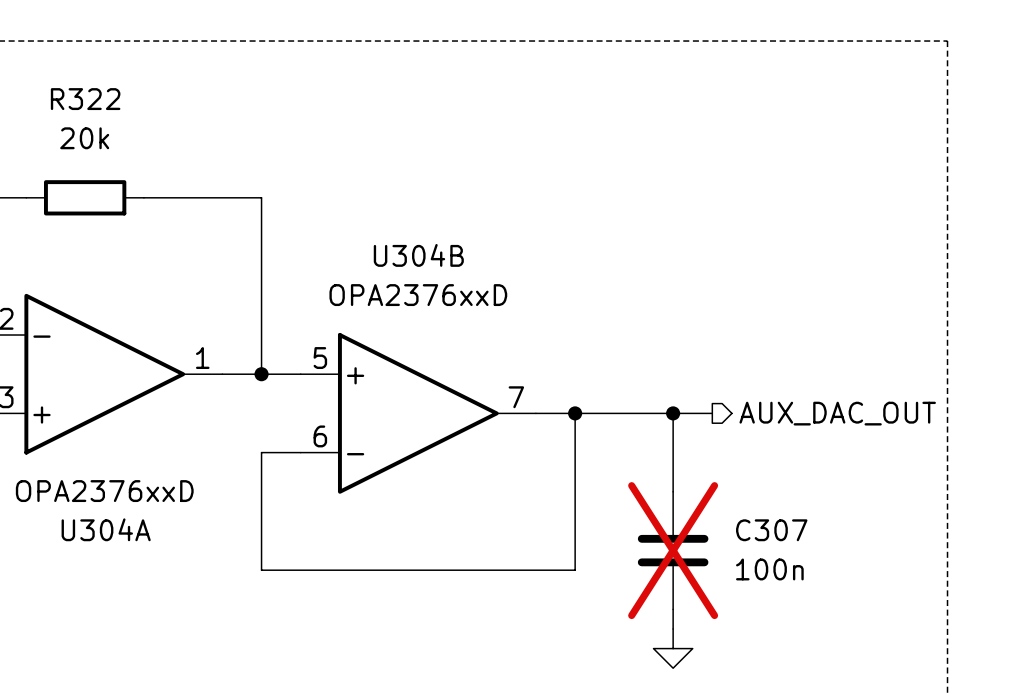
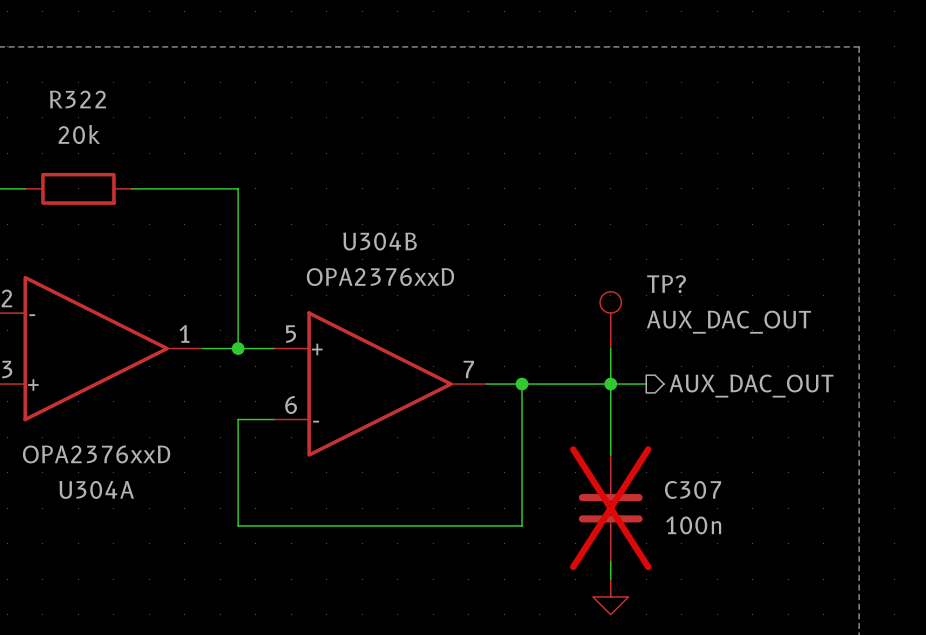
TP?: none -> AUX_DAC_OUT (610, 320)
wire: none -> (610, 348) (610, 384)

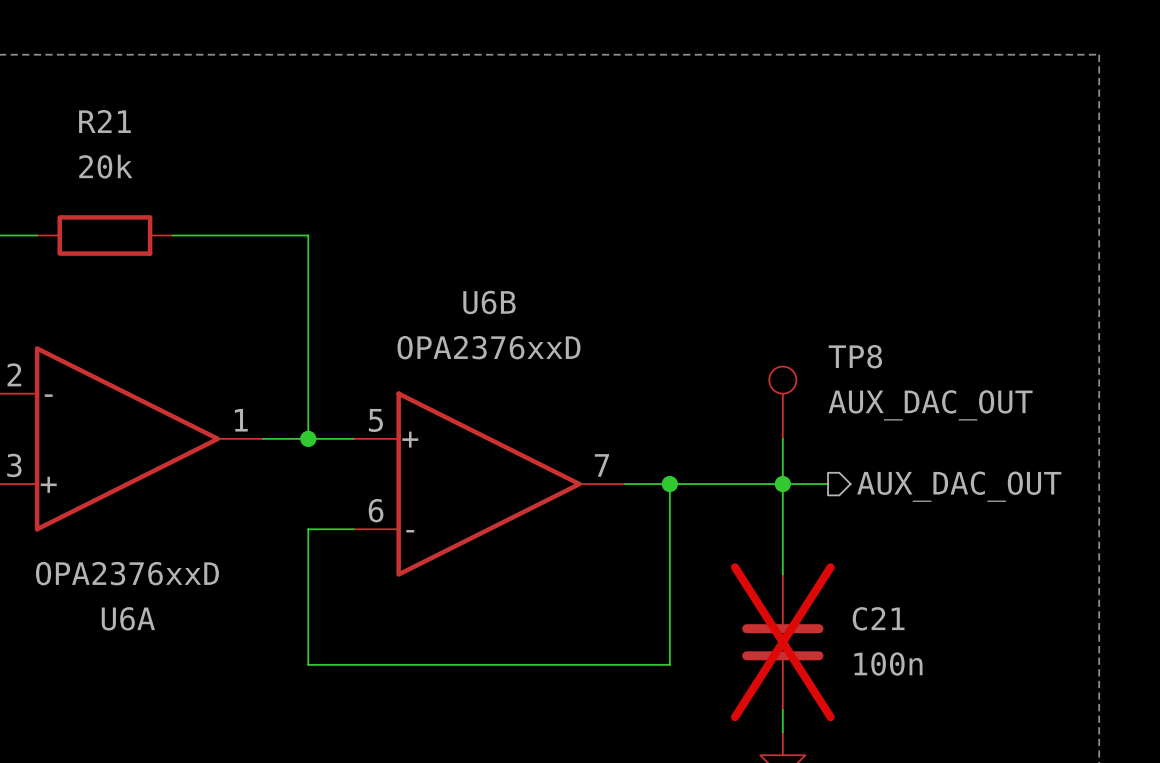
R322 name: R322 (77, 99) -> R21 (104, 121)
U304B name: U304B (380, 241) -> U6B (489, 302)
TP? name: TP? (666, 284) -> TP8 (855, 356)
U304A name: U304A (96, 489) -> U6A (128, 618)
C307 name: C307 (693, 489) -> C21 (878, 618)

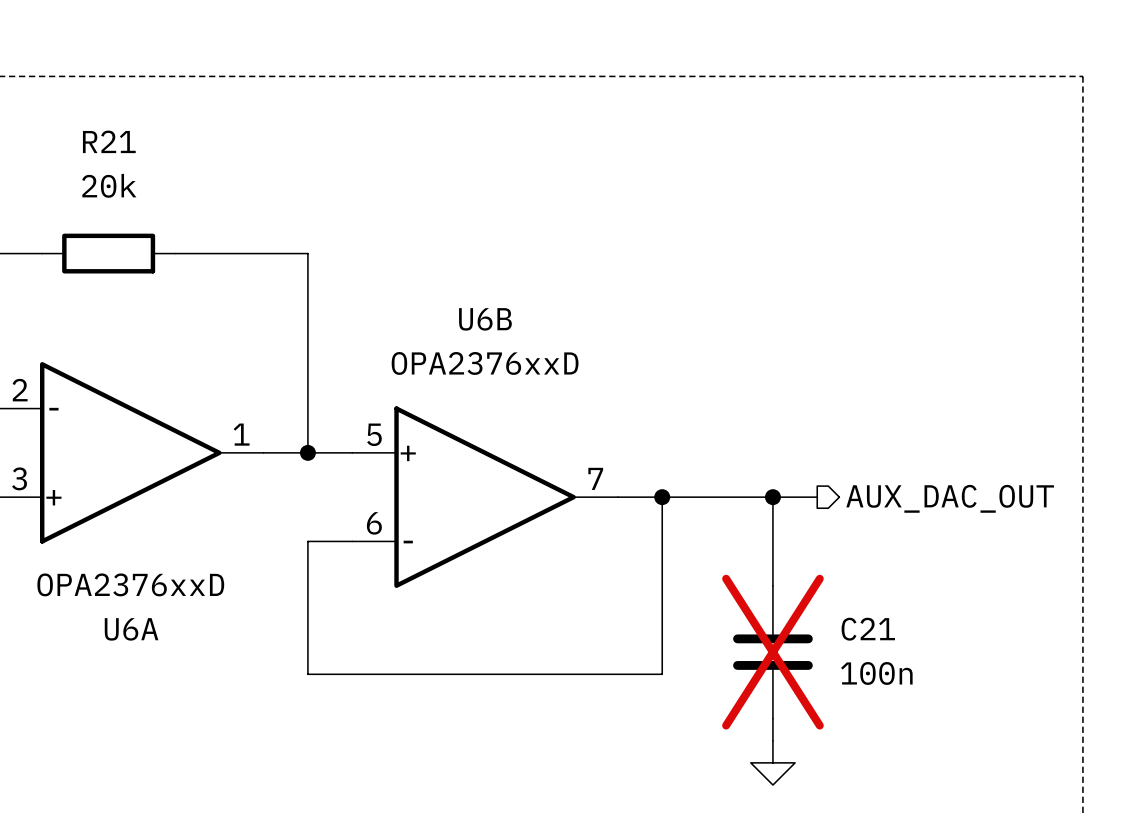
TP8: AUX_DAC_OUT (782, 402) -> none
wire: (782, 438) (782, 484) -> none

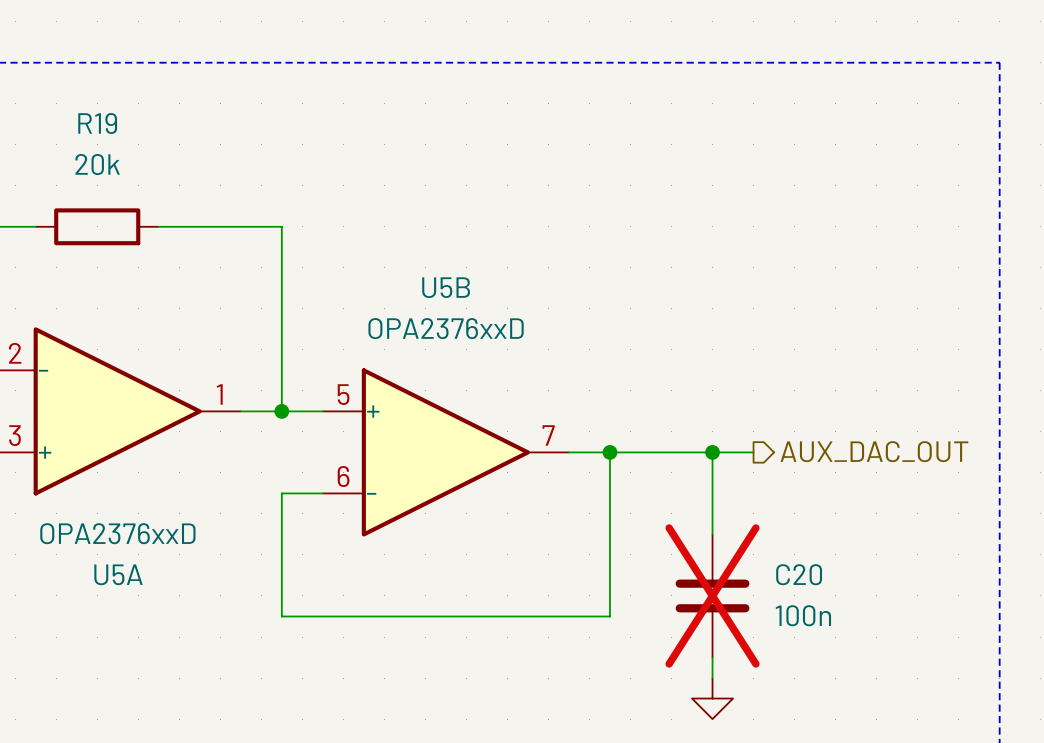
R21 name: R21 (109, 141) -> R19 (97, 123)
U6B name: U6B (485, 319) -> U5B (446, 287)
U6A name: U6A (131, 629) -> U5A (118, 574)
C21 name: C21 (868, 629) -> C20 (799, 574)

